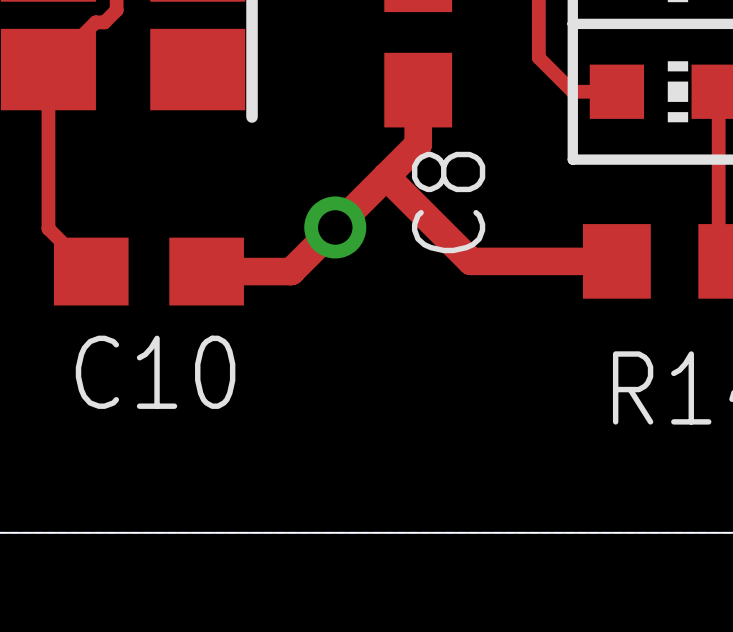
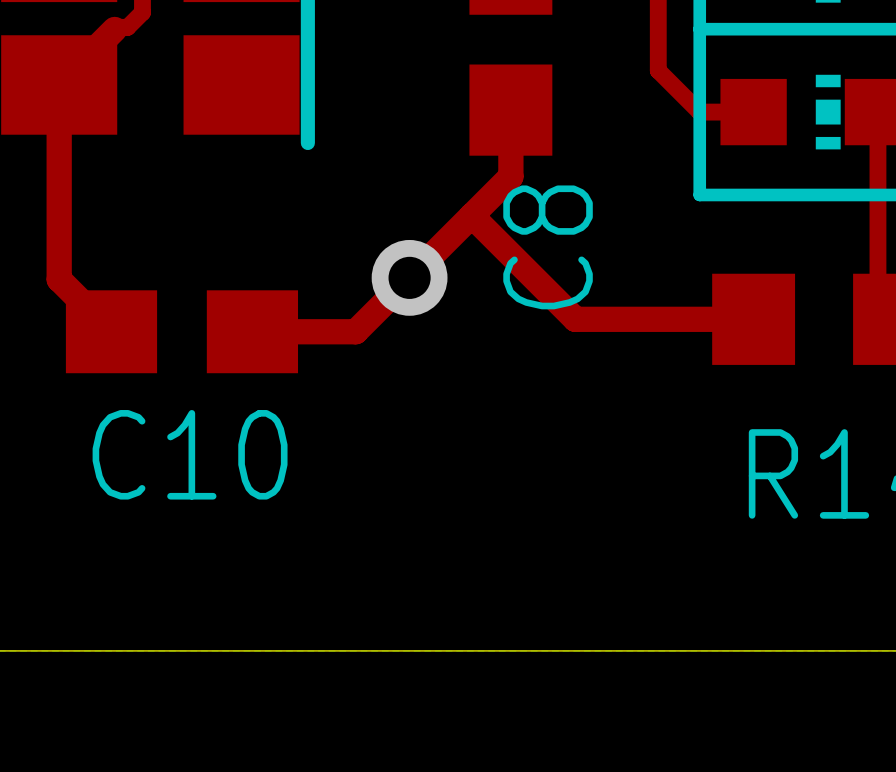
top track width: thin (93, 24) (48, 69) (48, 228) (91, 271) -> thick (114, 29) (59, 84) (59, 279) (111, 331)
top track width: thick (418, 90) (418, 144) (291, 271) (206, 271) -> thin (510, 110) (510, 176) (355, 331) (252, 331)
top track width: thick (386, 176) (471, 261) (616, 261) -> thin (471, 215) (575, 319) (753, 319)

